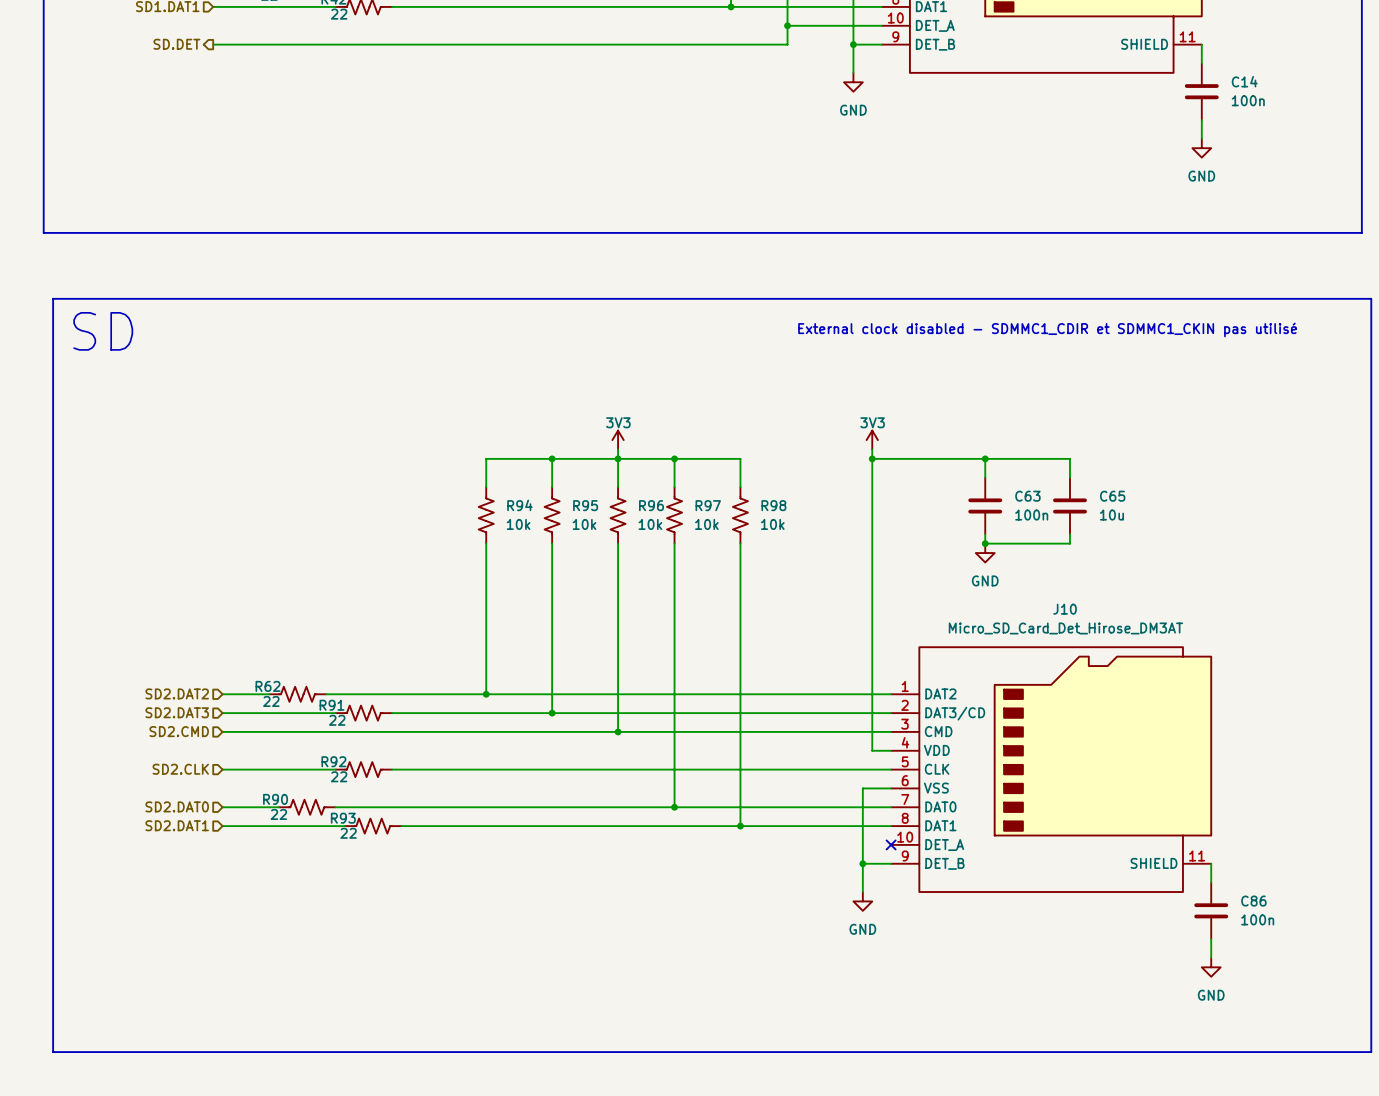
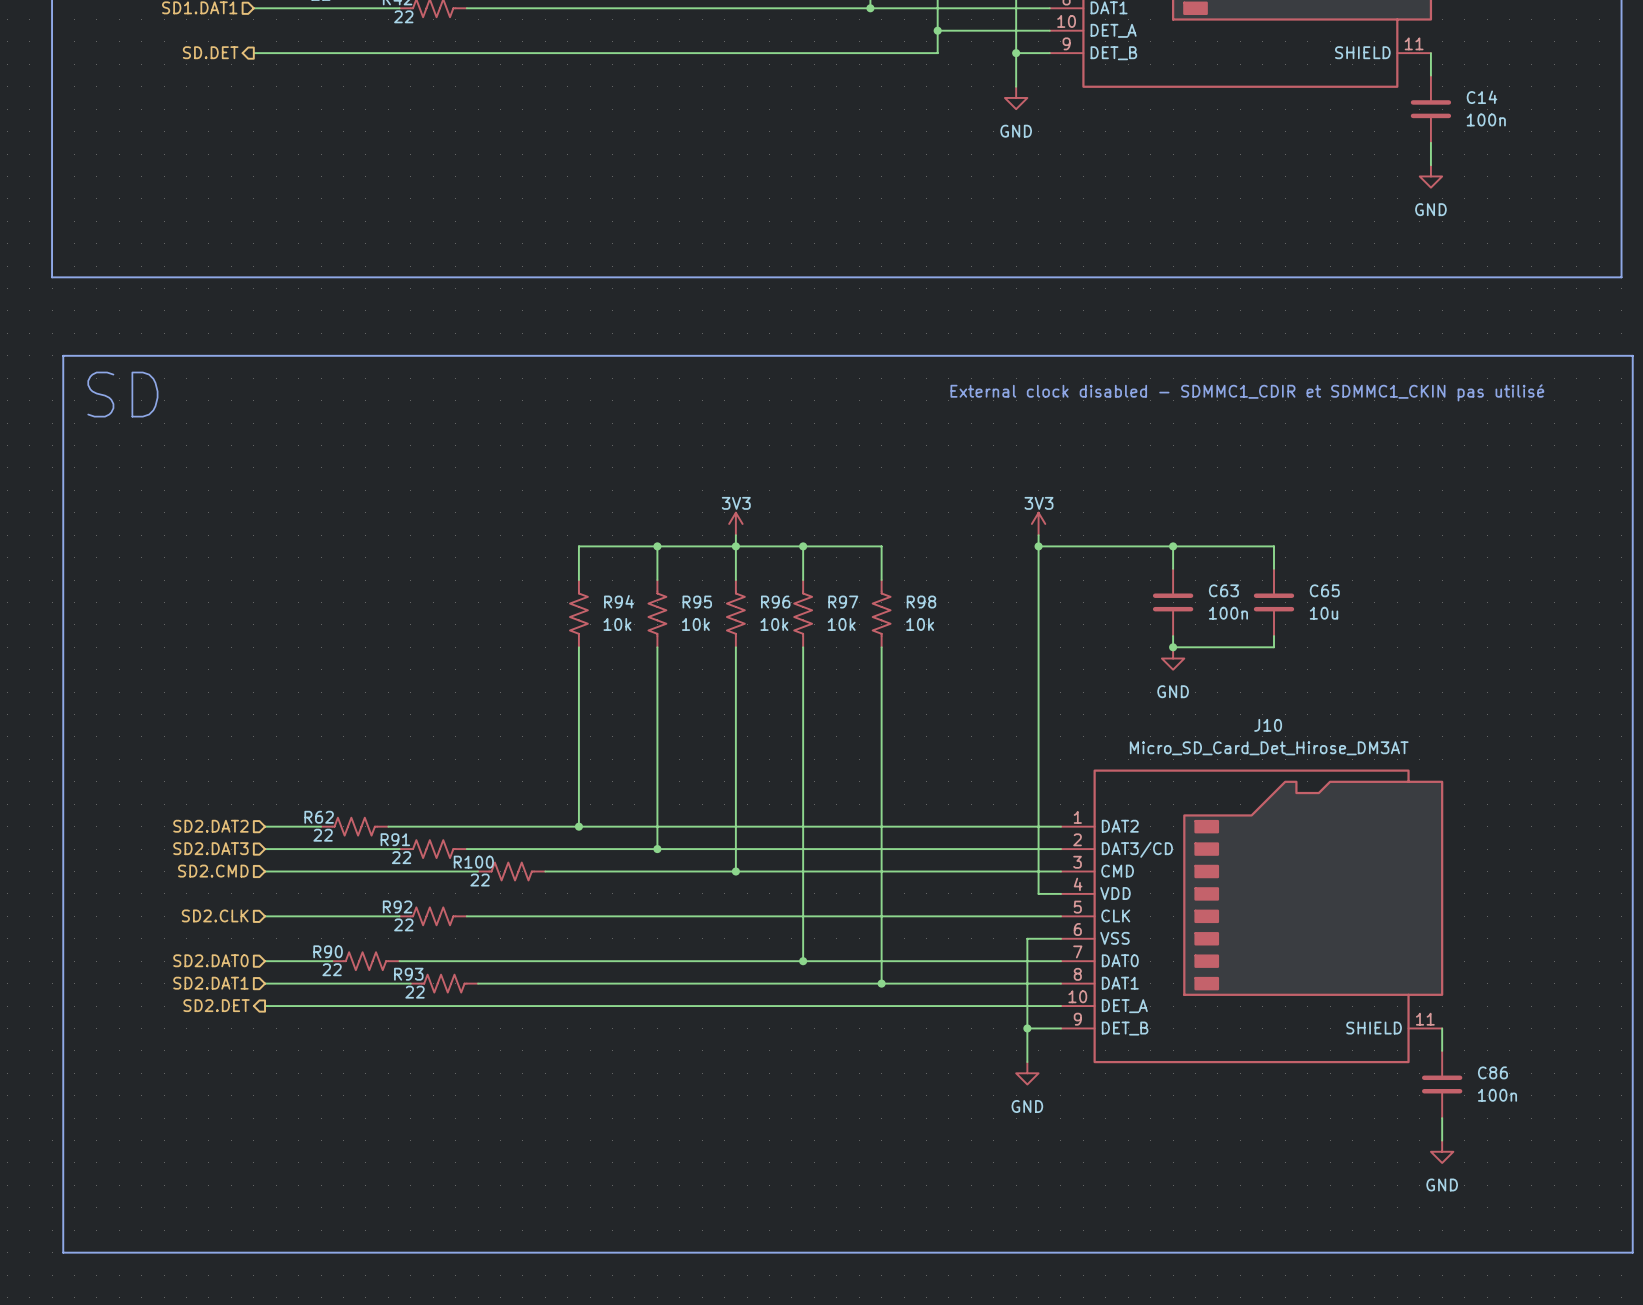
R100: none -> 22 (511, 871)
hierarchical label: none -> SD2.DET (216, 1005)
wire: none -> (265, 1006) (1060, 1006)
no-connect mark: (891, 844) -> none

